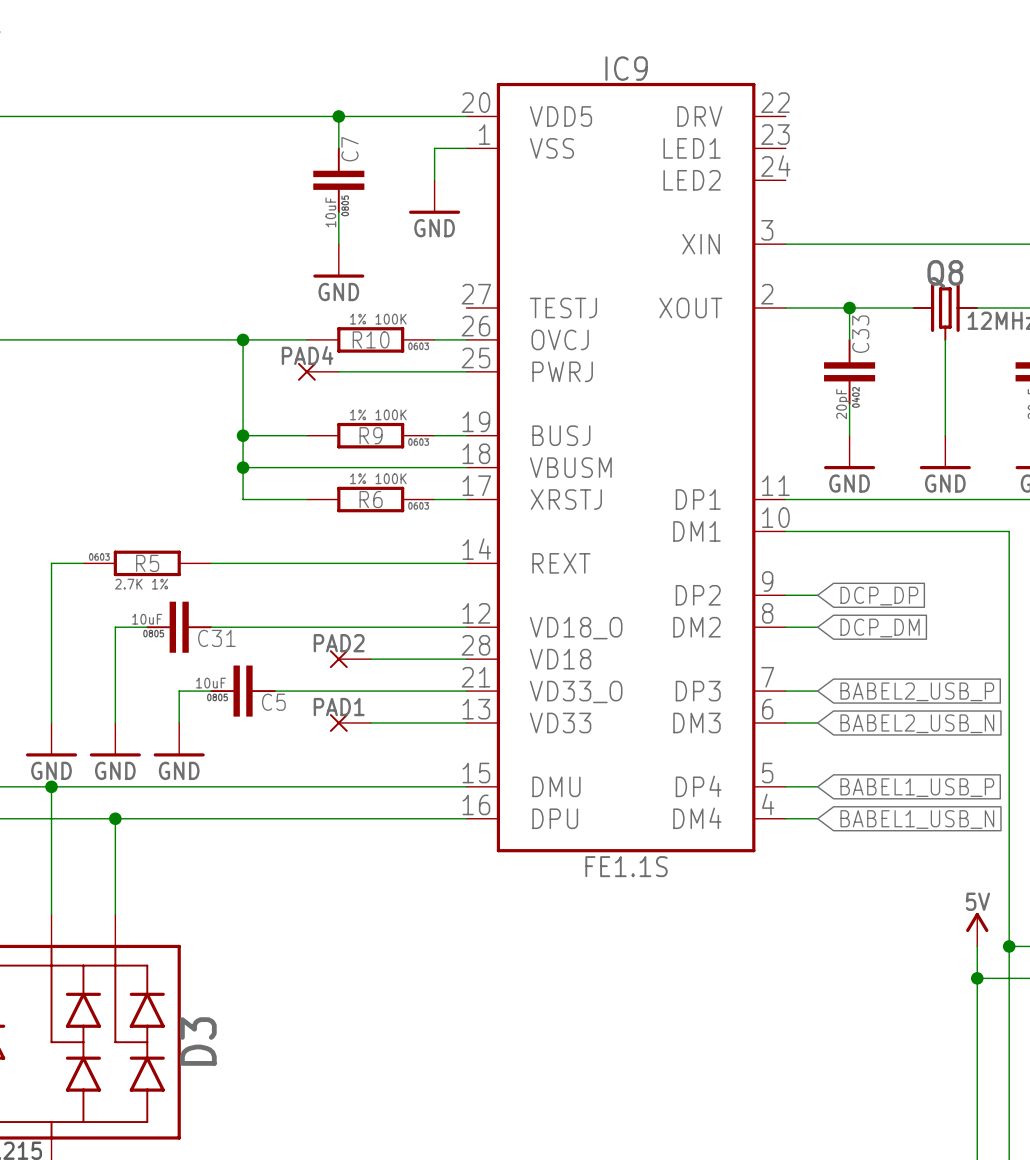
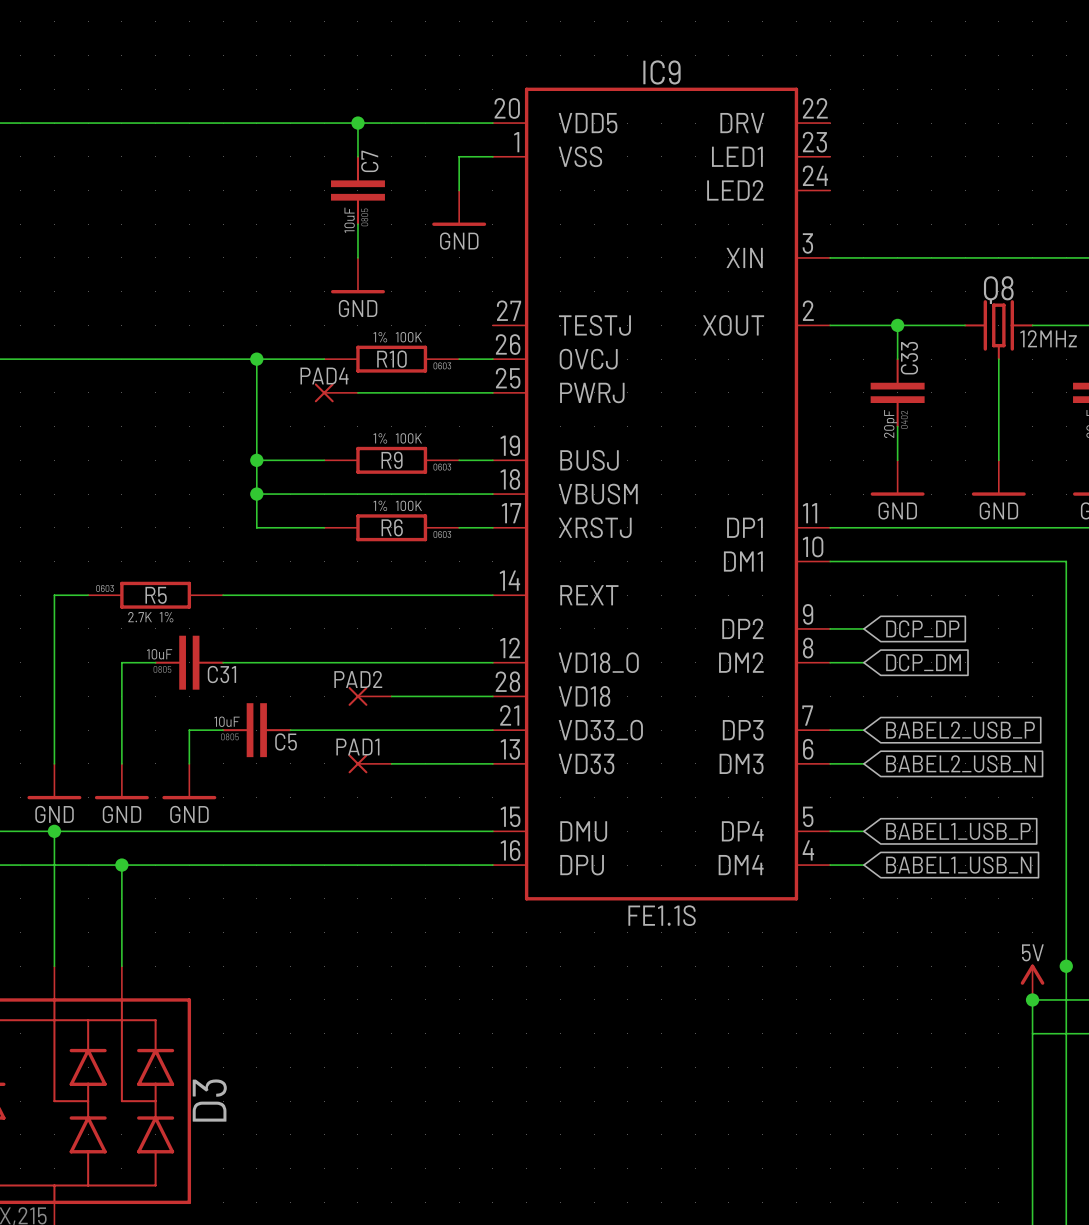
junction: none -> (1066, 966)
wire: none -> (1032, 999) (1066, 999)
junction: none -> (1032, 999)
junction: (1009, 946) -> none
junction: (977, 978) -> none

